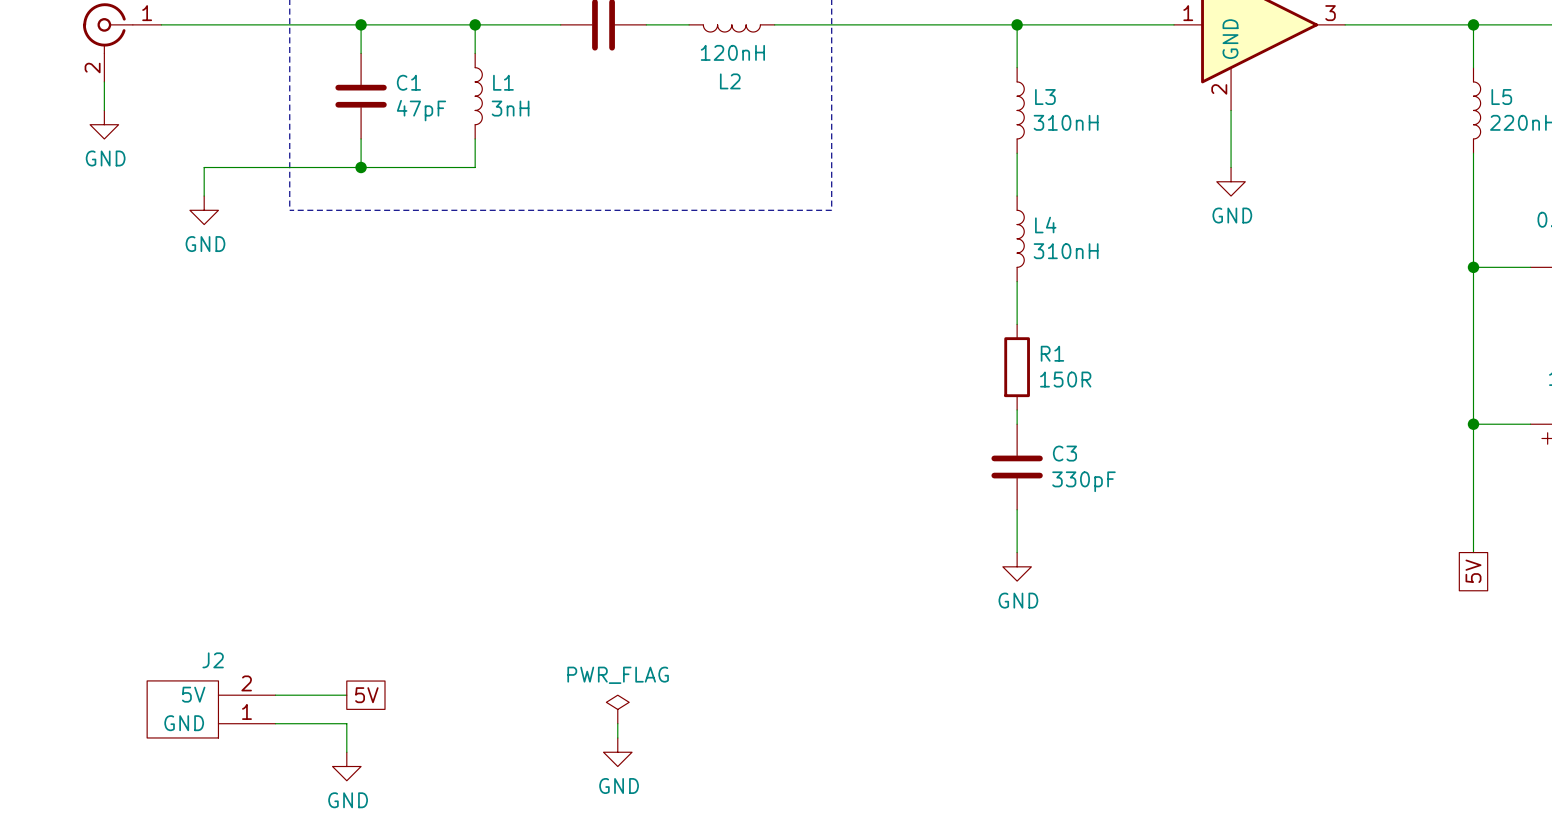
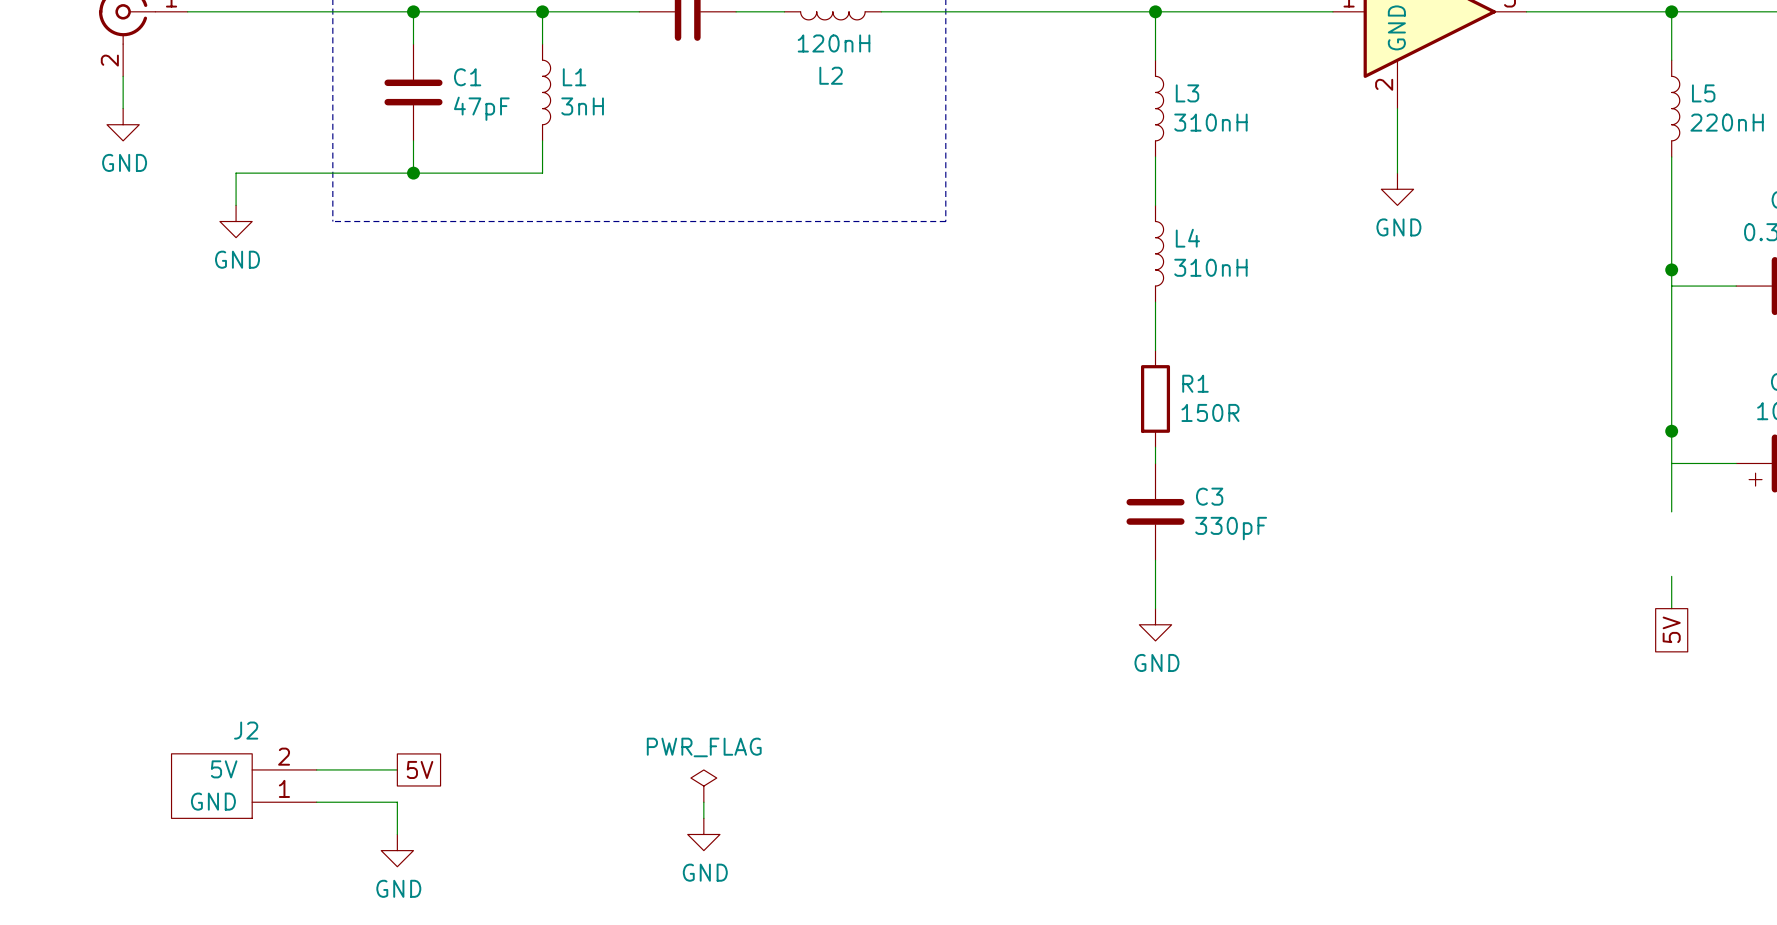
junction position: (1473, 267) -> (1671, 269)
junction position: (1473, 424) -> (1671, 431)
wire: (1473, 467) (1473, 524) -> none

